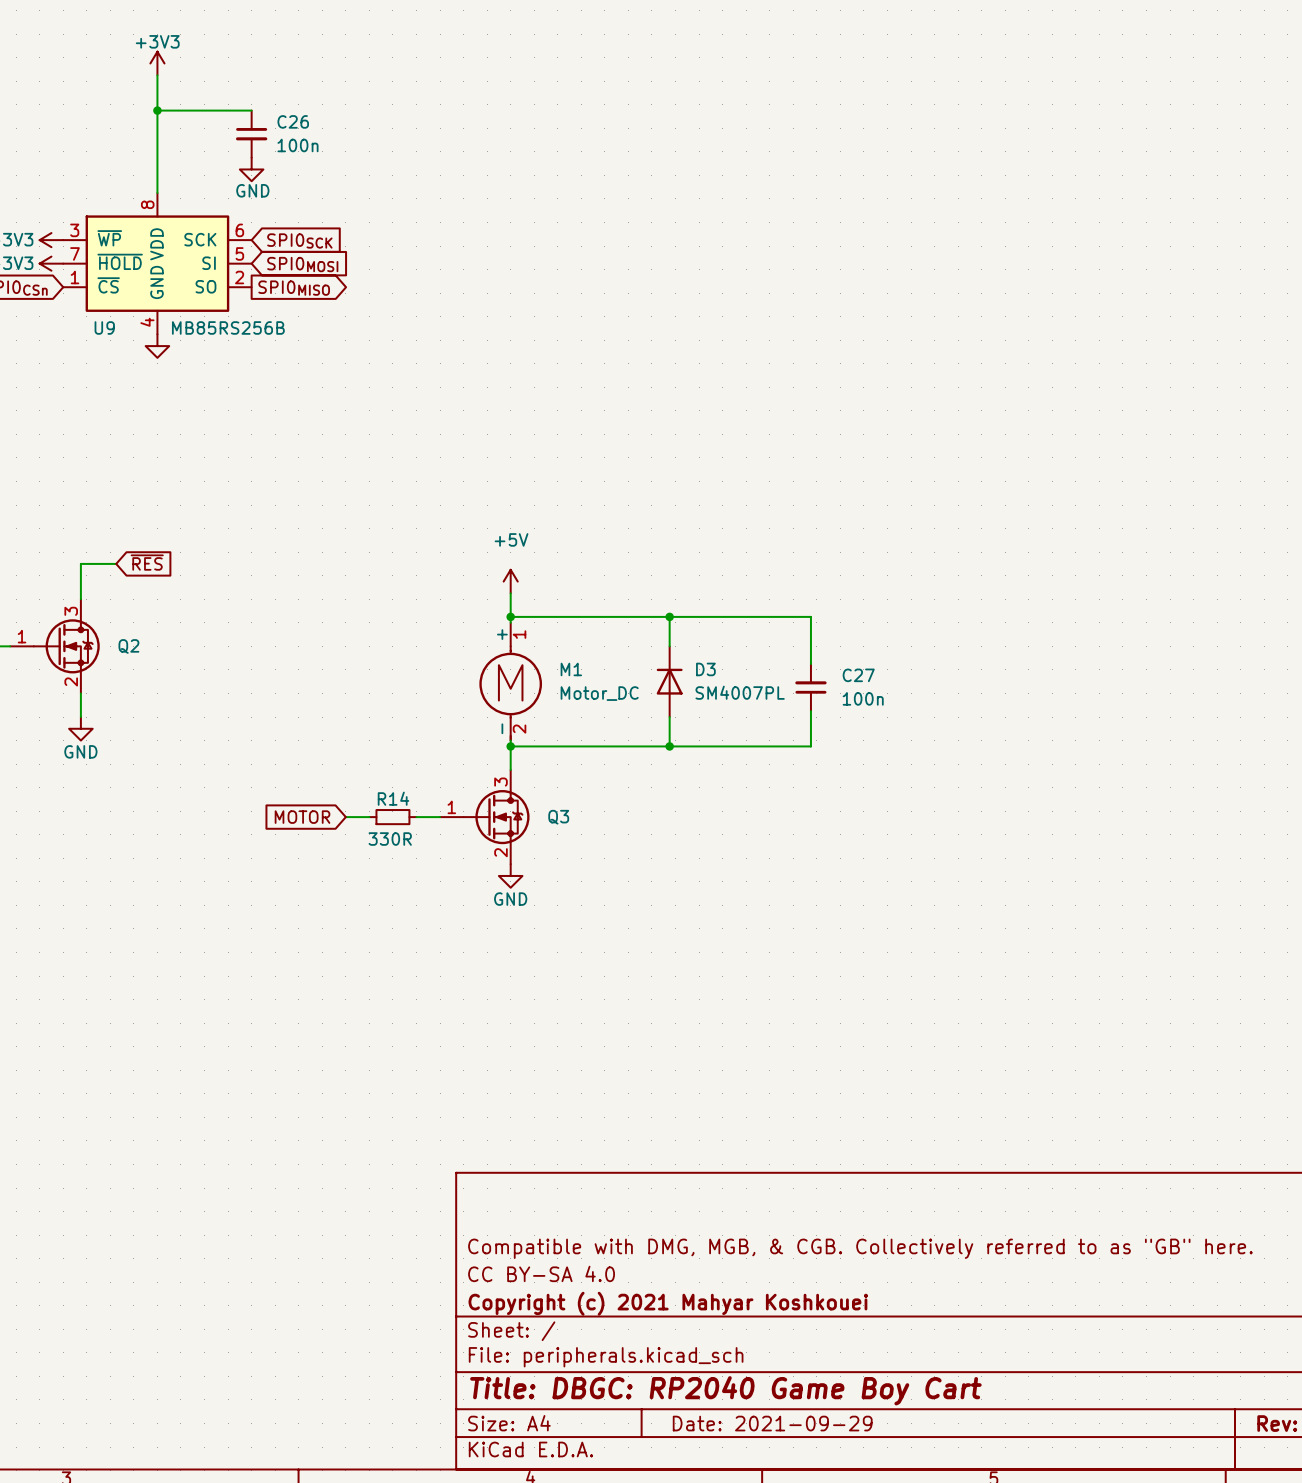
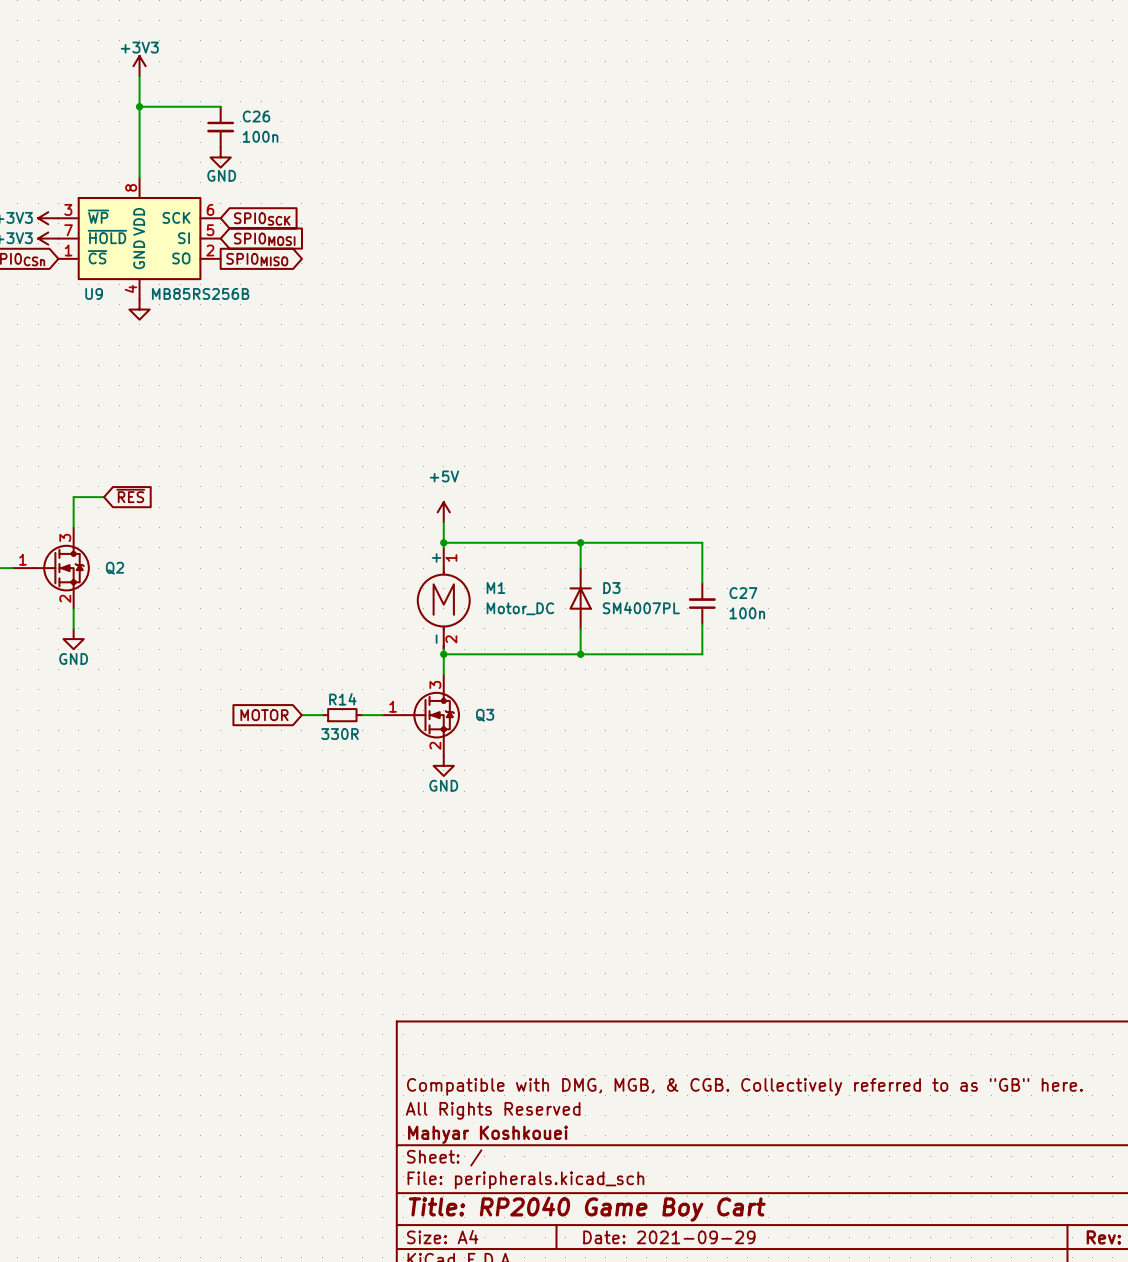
title block: CC BY-SA 4.0 (541, 1273) -> All Rights Reserved (493, 1110)
title block: Copyright (c) 2021 Mahyar Koshkouei (668, 1303) -> Mahyar Koshkouei (487, 1134)
title block: Title: DBGC: RP2040 Game Boy Cart (725, 1390) -> Title: RP2040 Game Boy Cart (587, 1209)

